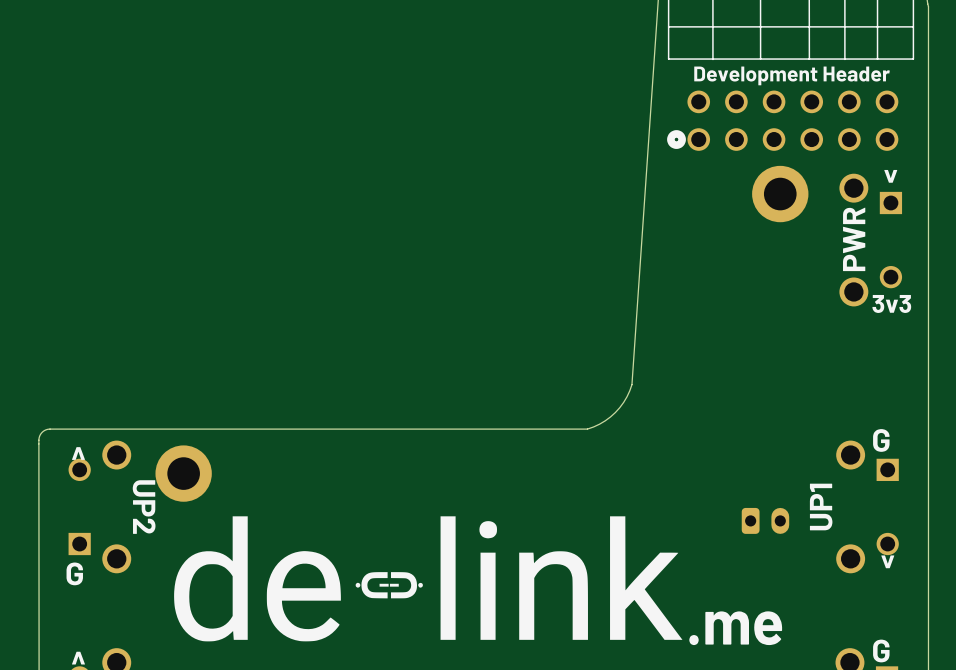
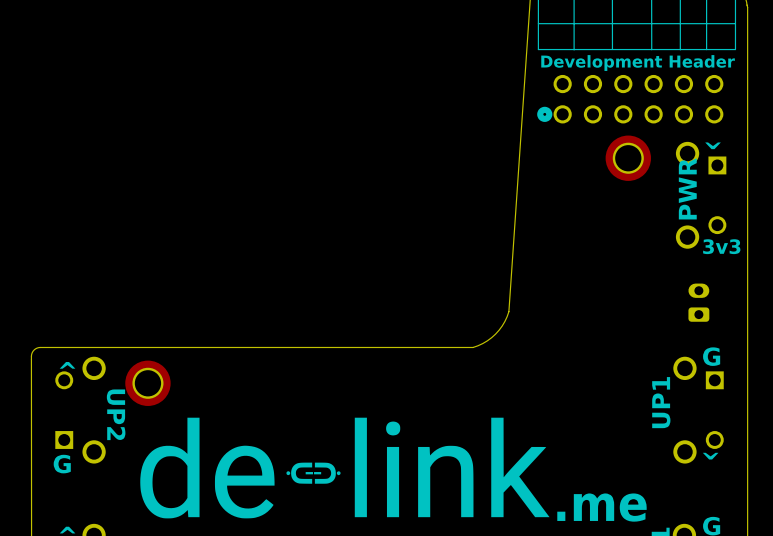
part rotation: 0° (765, 520) -> 90° counterclockwise (698, 302)
part position: (765, 520) -> (698, 302)

